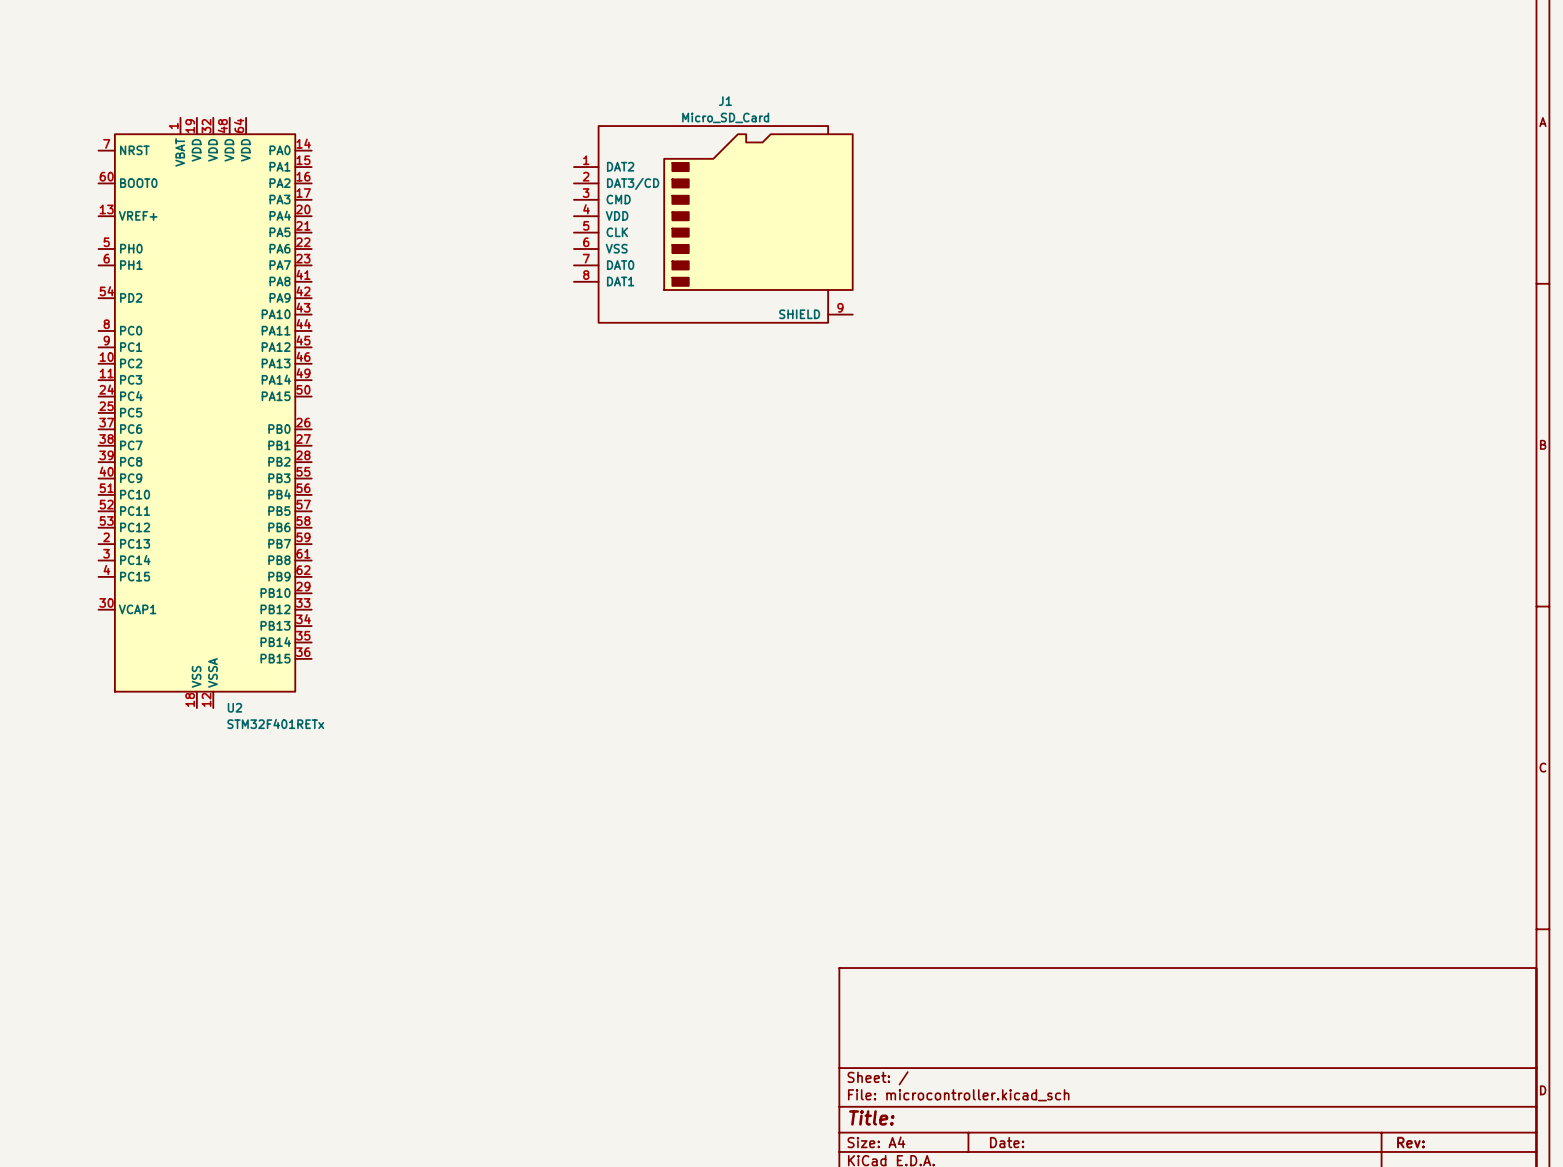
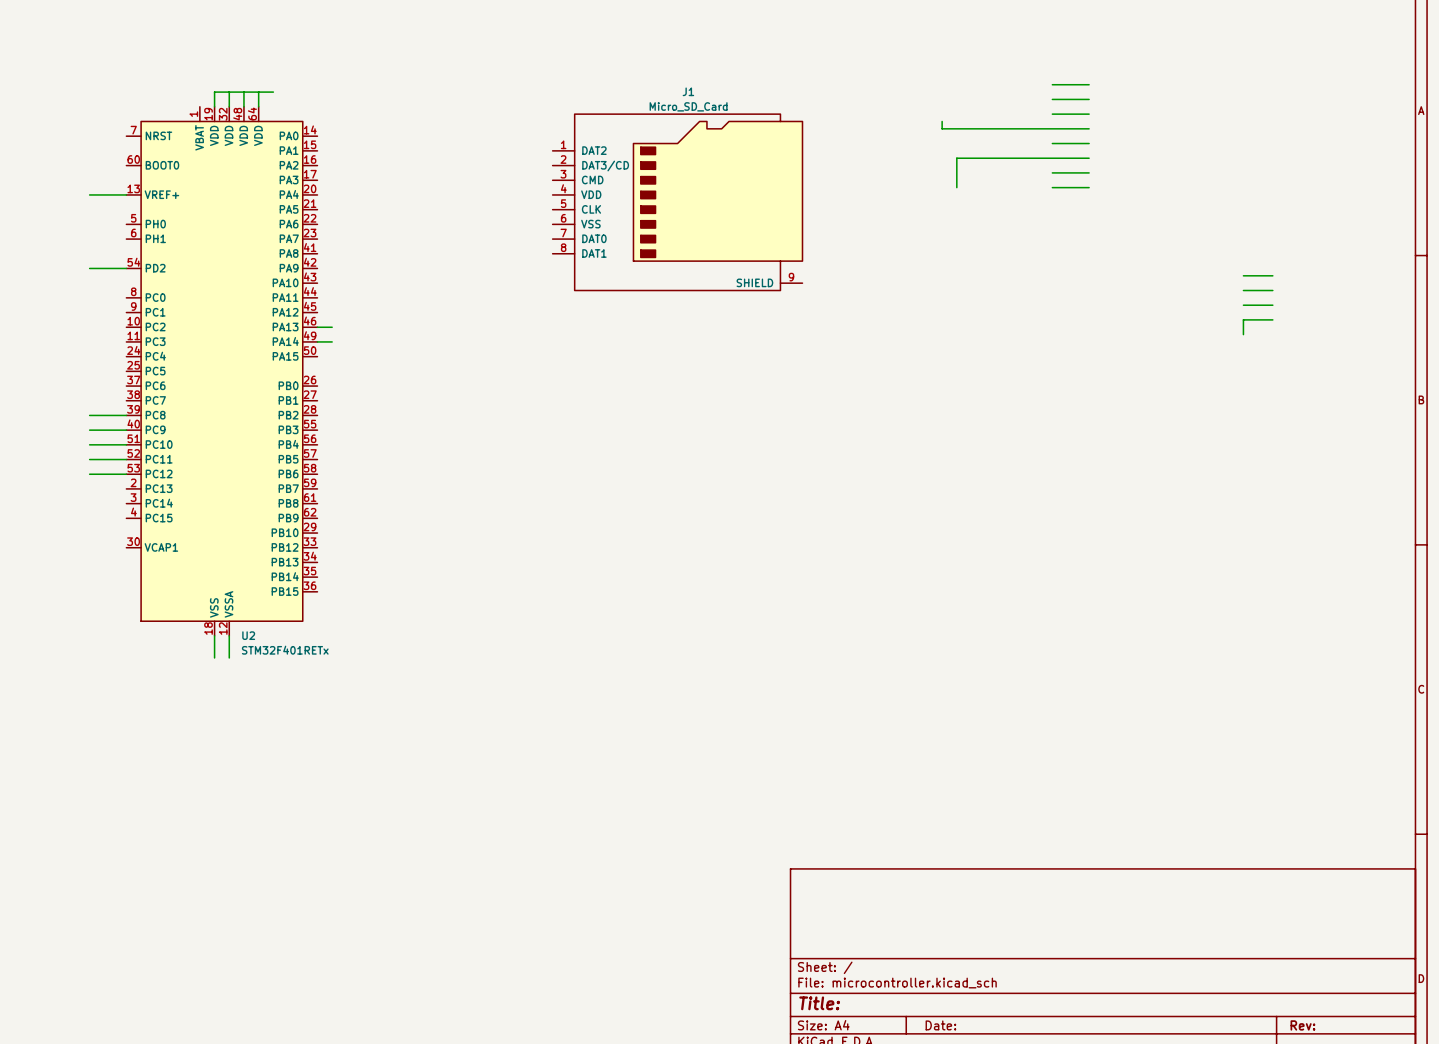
wire: none -> (1052, 84) (1089, 84)
wire: none -> (229, 92) (229, 106)
wire: none -> (243, 92) (243, 106)
wire: none -> (258, 92) (258, 106)
wire: none -> (273, 92) (214, 92) (214, 106)
wire: none -> (1052, 99) (1089, 99)
wire: none -> (1052, 114) (1089, 114)
wire: none -> (942, 121) (942, 128) (1089, 128)
wire: none -> (1052, 143) (1089, 143)
wire: none -> (1089, 158) (956, 158) (956, 187)
wire: none -> (1052, 172) (1089, 172)
wire: none -> (1052, 187) (1089, 187)
wire: none -> (89, 194) (126, 194)
wire: none -> (89, 268) (126, 268)
wire: none -> (1243, 275) (1272, 275)
wire: none -> (1243, 290) (1272, 290)
wire: none -> (1243, 305) (1272, 305)
wire: none -> (1272, 319) (1243, 319) (1243, 334)
wire: none -> (317, 327) (332, 327)
wire: none -> (317, 341) (332, 341)
wire: none -> (89, 415) (126, 415)
wire: none -> (89, 430) (126, 430)
wire: none -> (89, 444) (126, 444)
wire: none -> (89, 459) (126, 459)
wire: none -> (89, 474) (126, 474)
wire: none -> (214, 635) (214, 657)
wire: none -> (229, 635) (229, 657)

